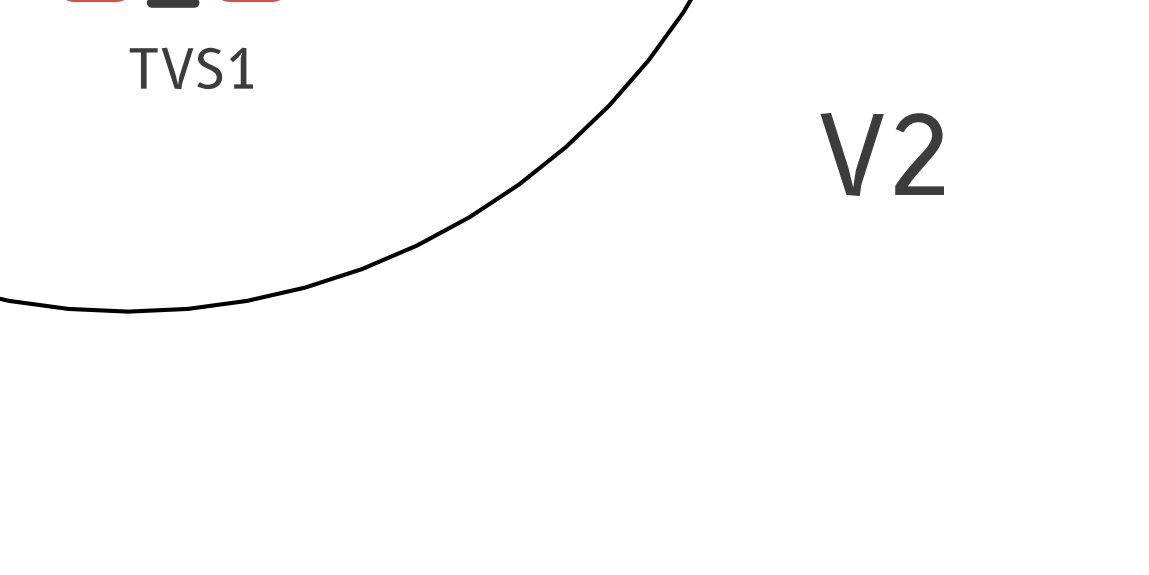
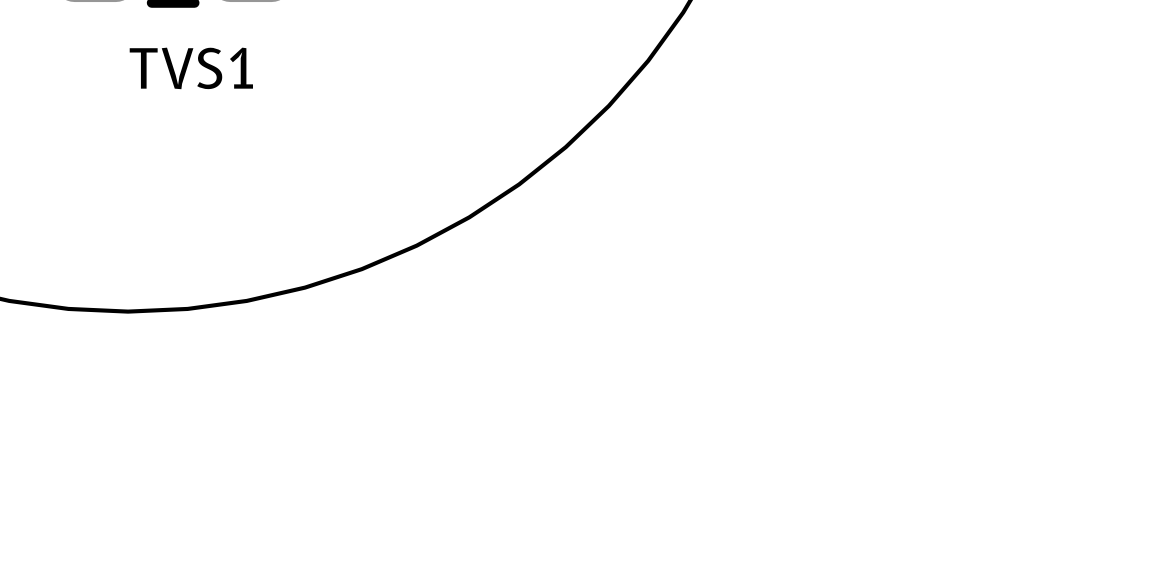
text: V2 (882, 154) -> none

